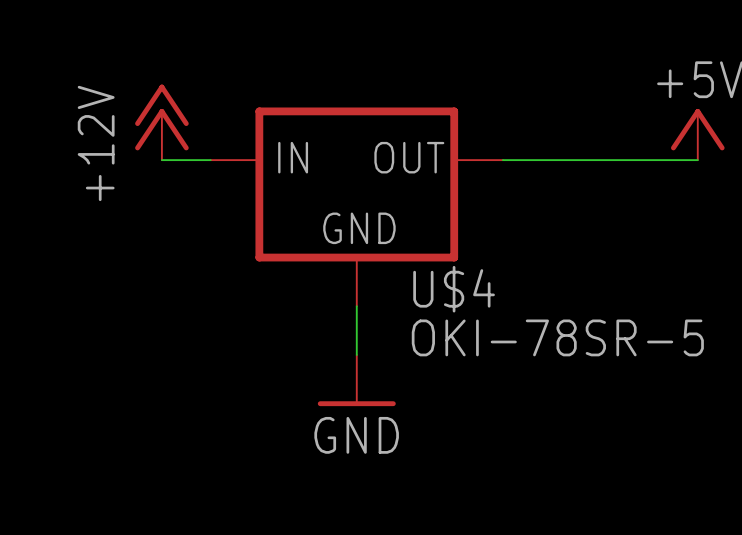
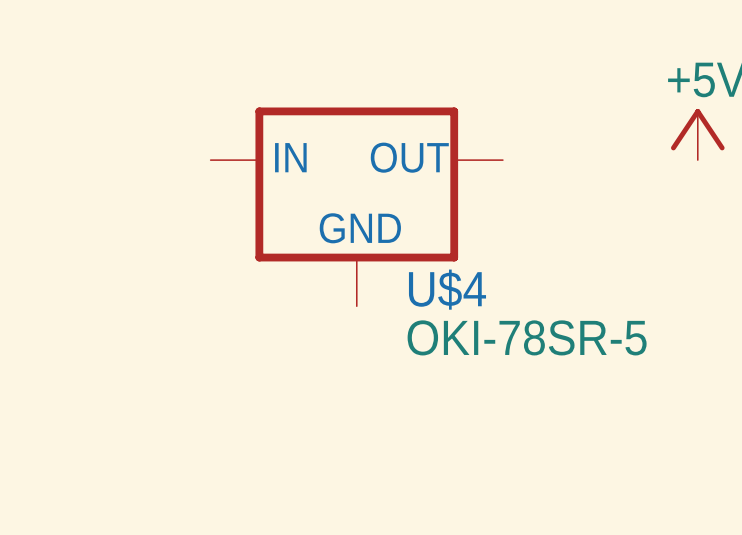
power symbol: +12V (161, 122) -> none
wire: (161, 160) (210, 160) -> none
wire: (502, 160) (697, 160) -> none
wire: (356, 306) (356, 354) -> none
power symbol: GND (356, 380) -> none

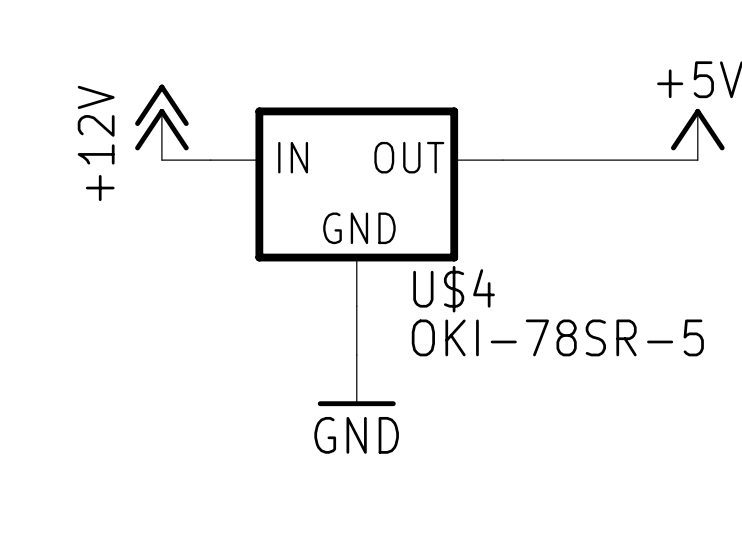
power symbol: none -> +12V (161, 122)
wire: none -> (161, 160) (210, 160)
wire: none -> (502, 160) (697, 160)
wire: none -> (356, 306) (356, 354)
power symbol: none -> GND (356, 380)

